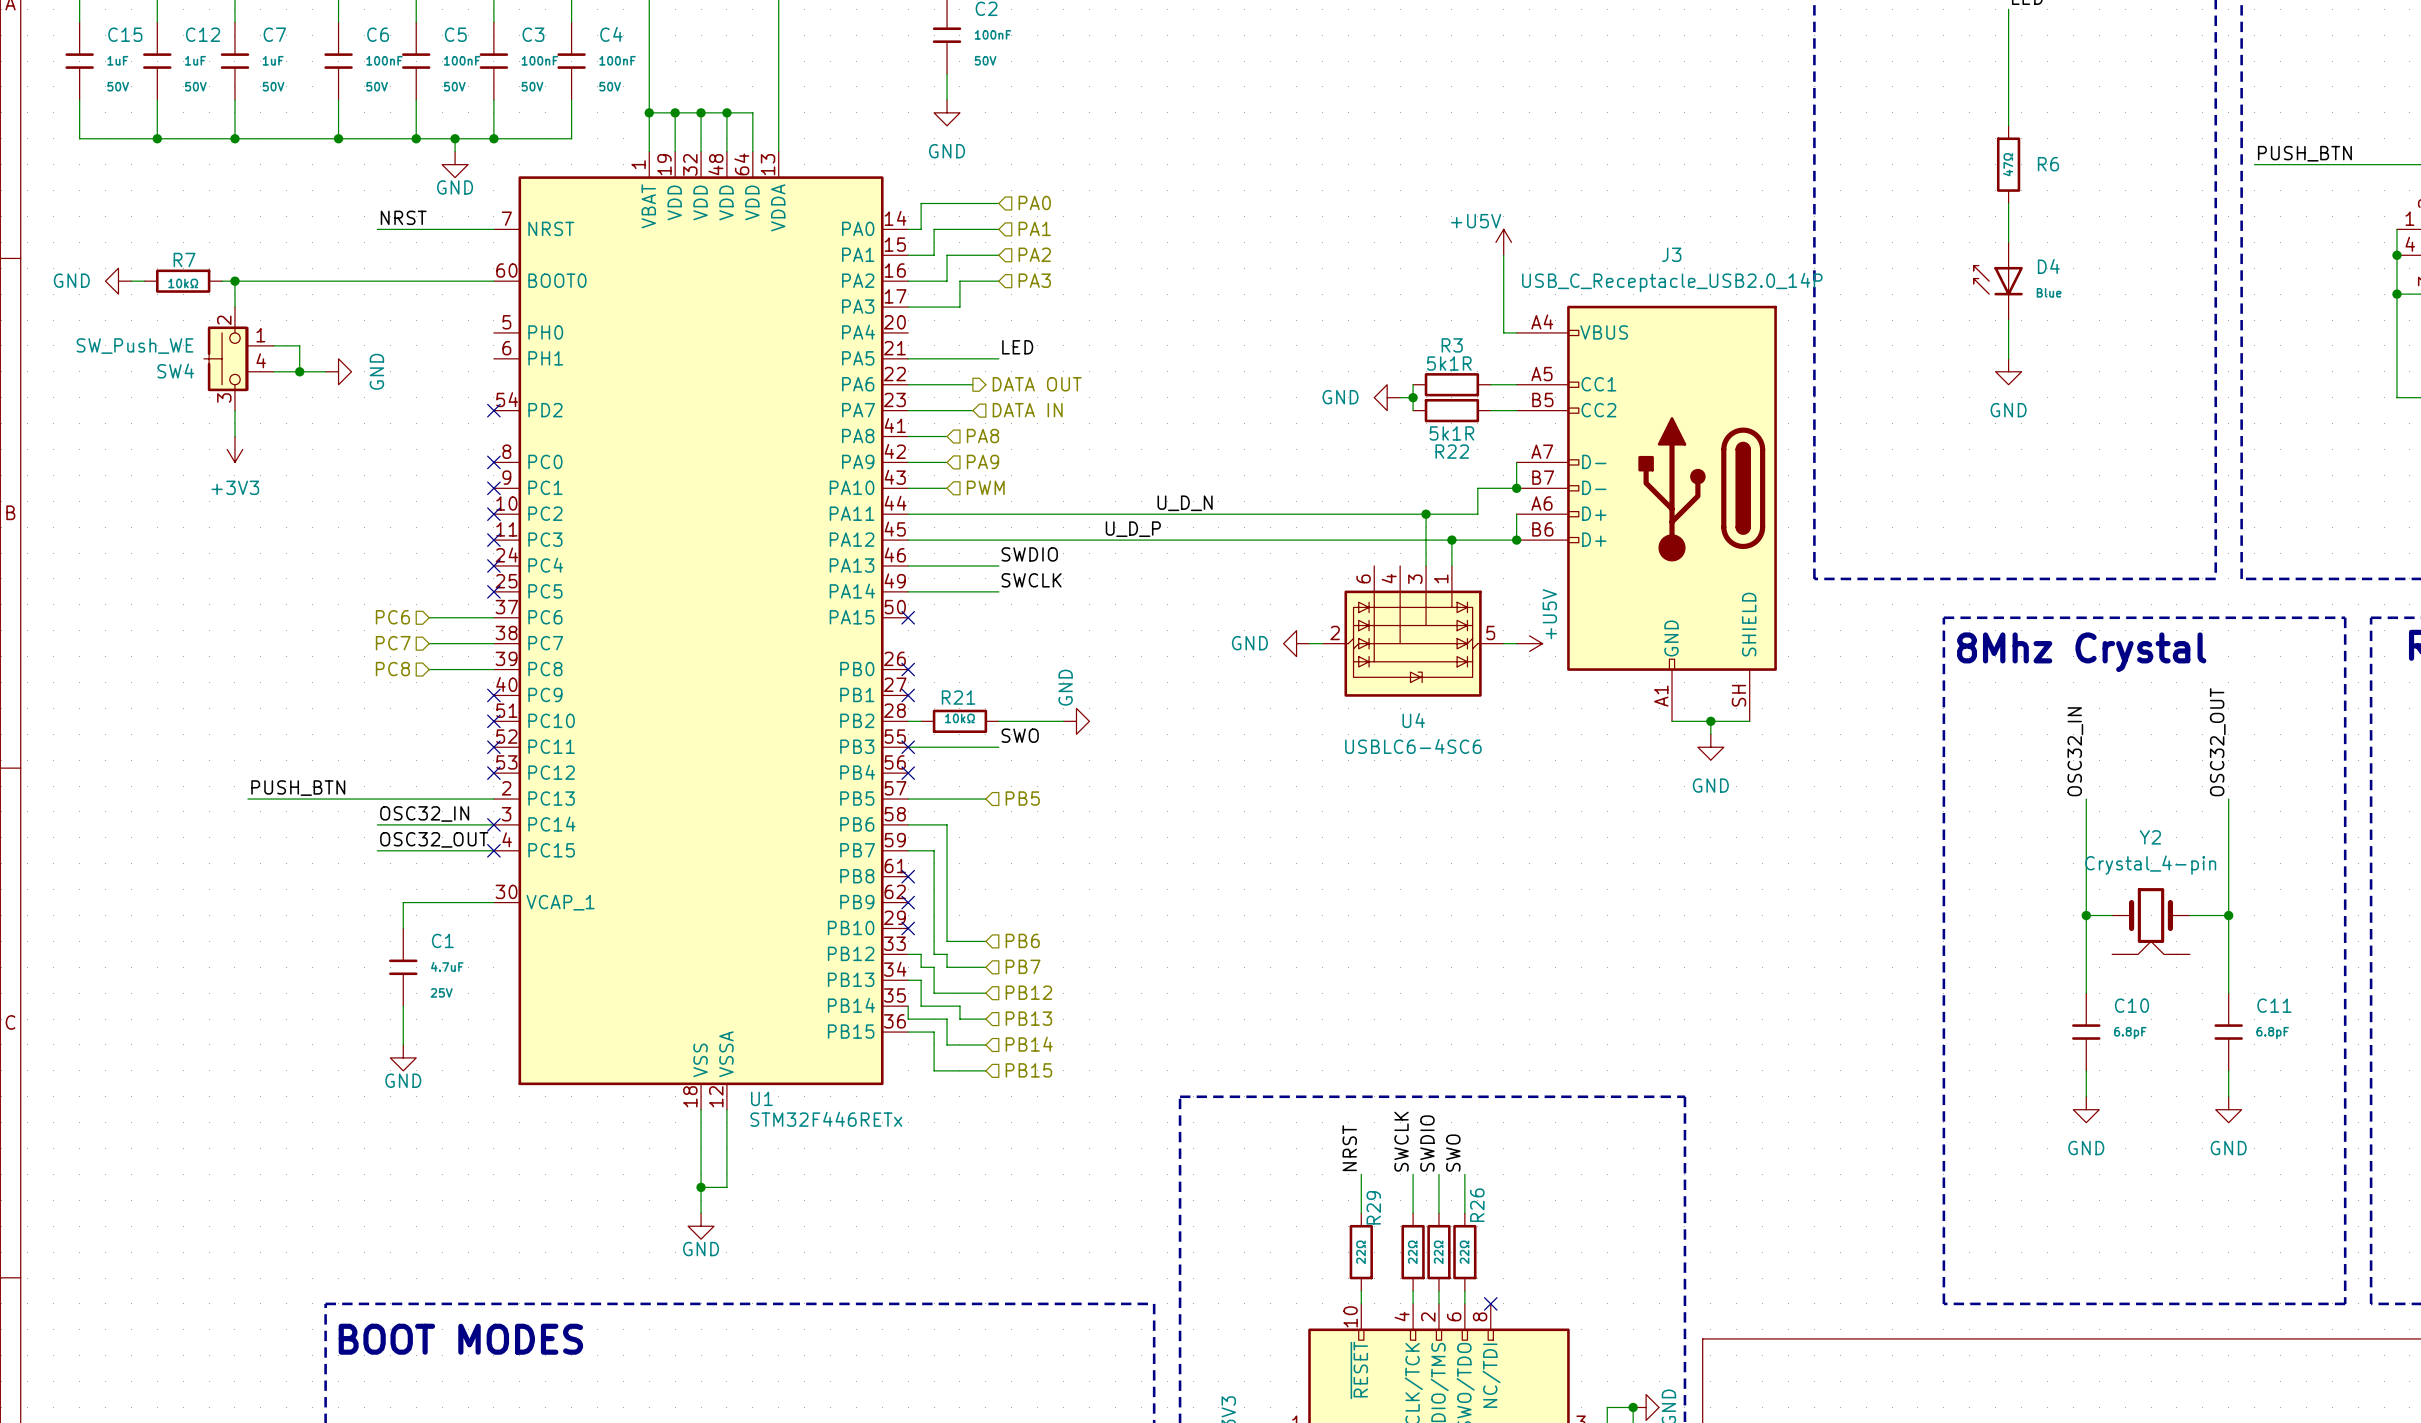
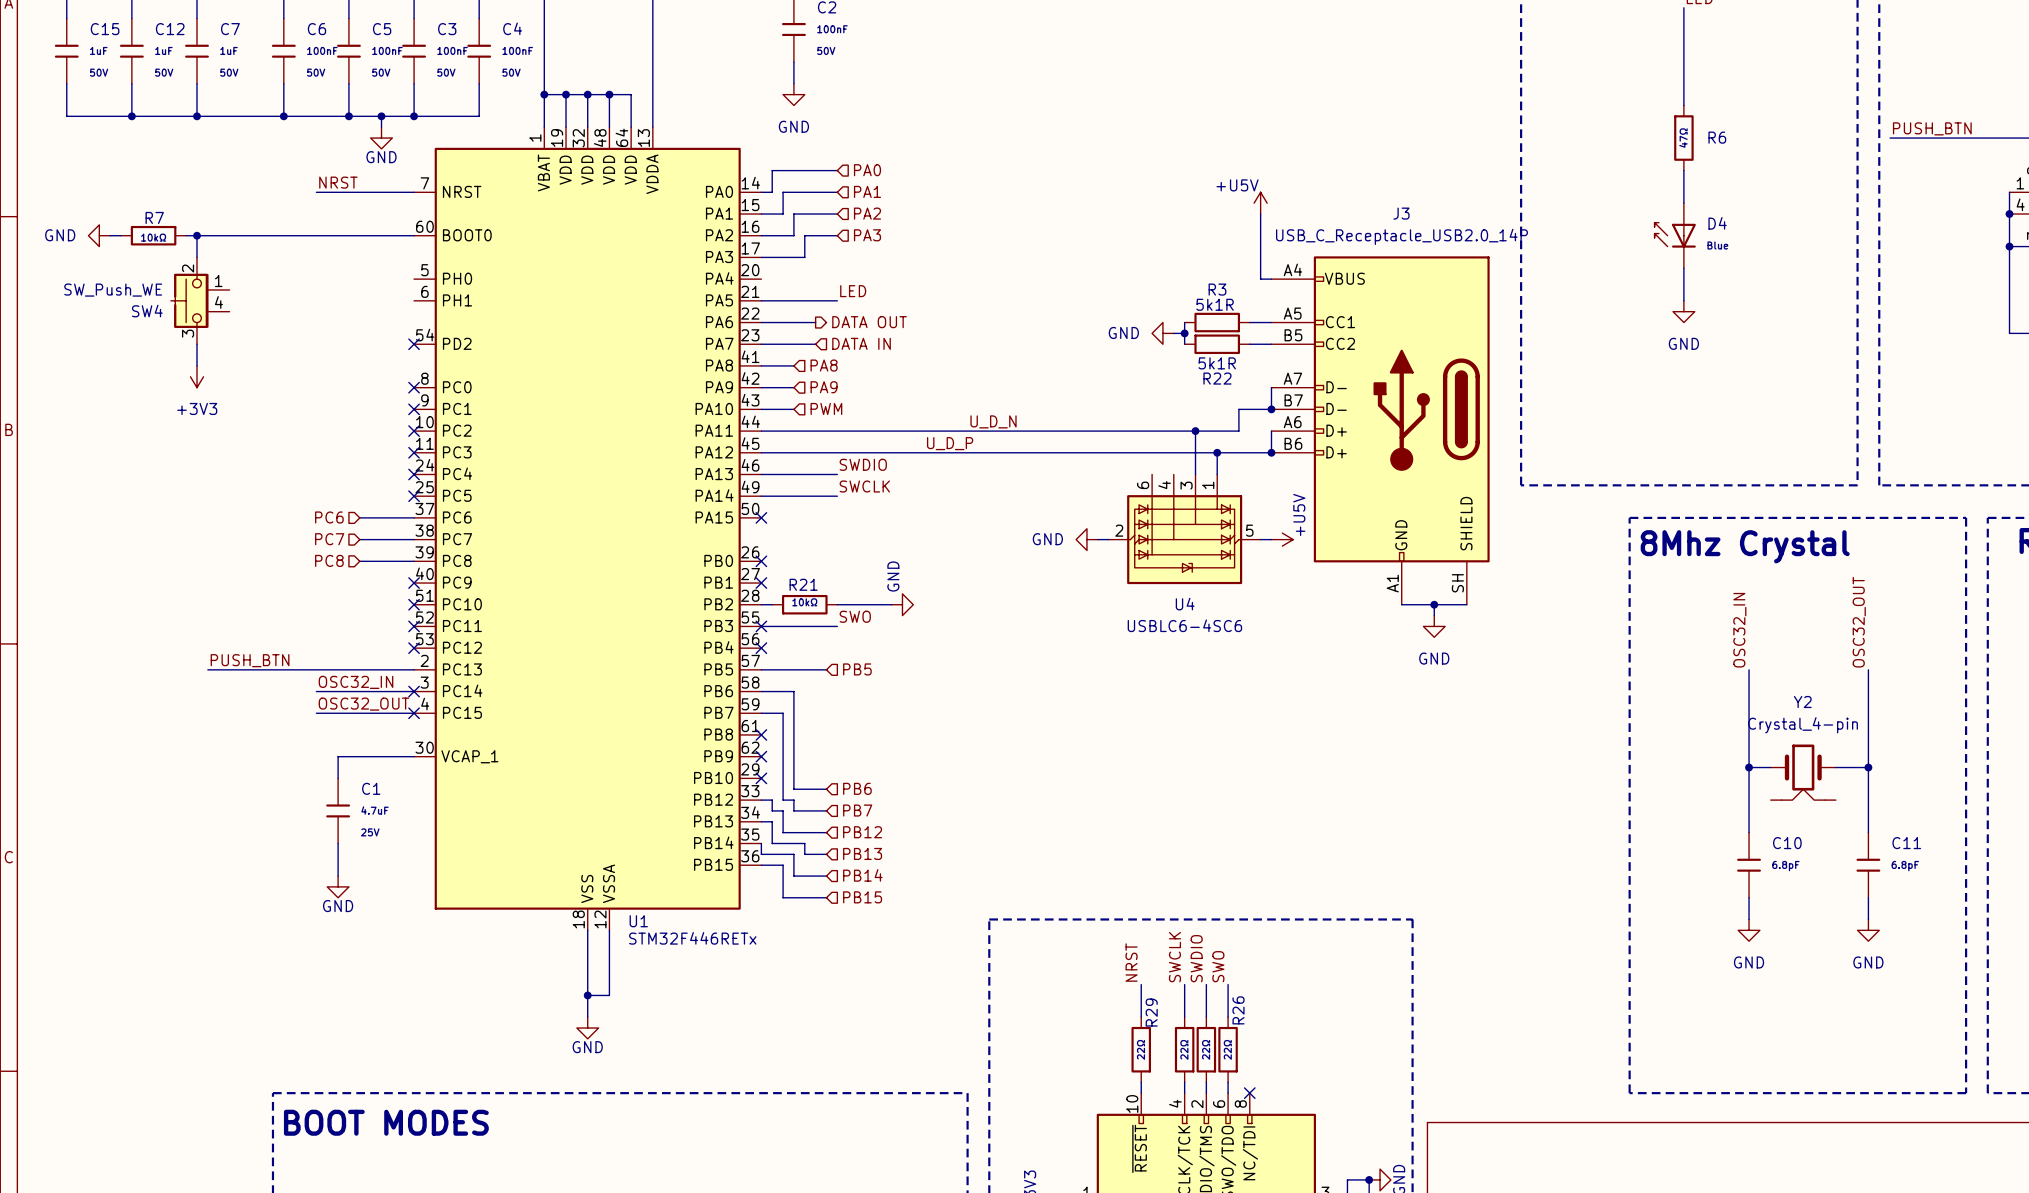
wire: (273, 345) (299, 345) (299, 371) -> none
wire: (273, 371) (325, 371) -> none
junction: (299, 371) -> none
power symbol: GND (338, 371) -> none

